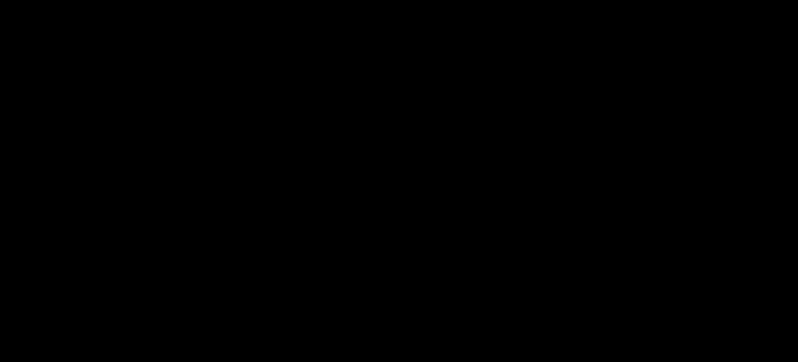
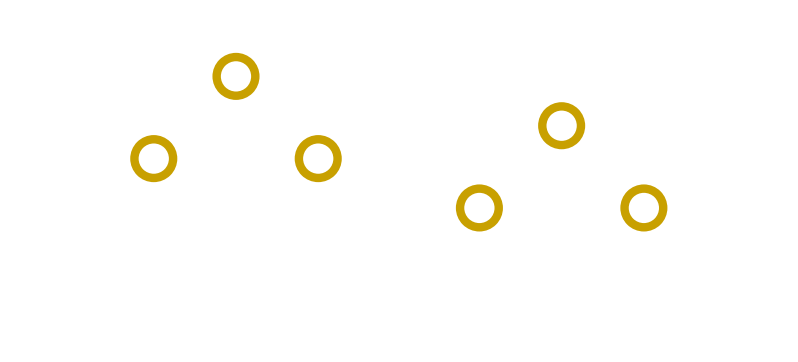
part: none -> (235, 117)
part: none -> (561, 166)

